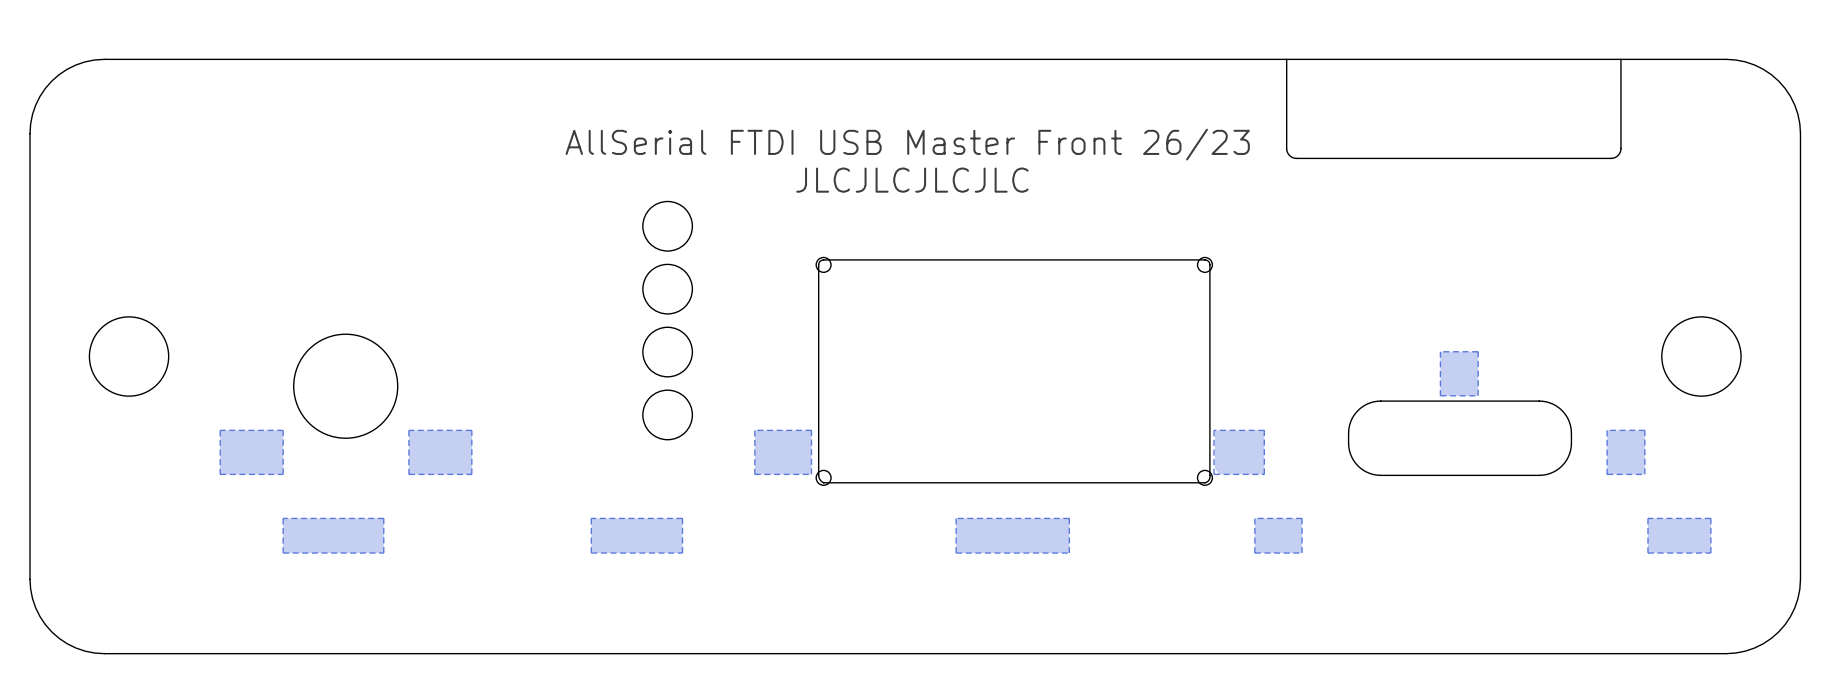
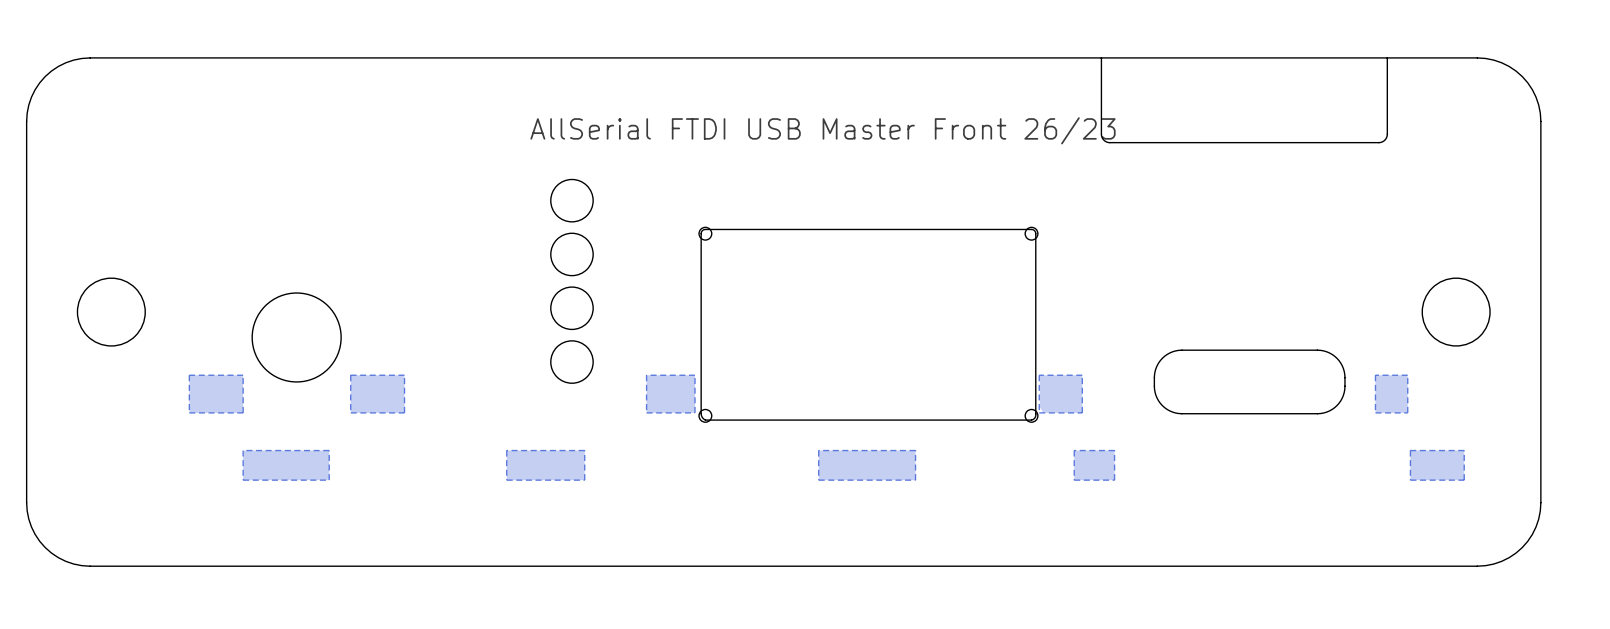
text position: AllSerial FTDI USB Master Front 26/23 (907, 144) -> AllSerial FTDI USB Master Front 26/23 (823, 130)
text: JLCJLCJLCJLC (912, 180) -> none
zone outline: (1478, 351) (1478, 395) (1440, 395) (1440, 351) (1478, 351) -> none

